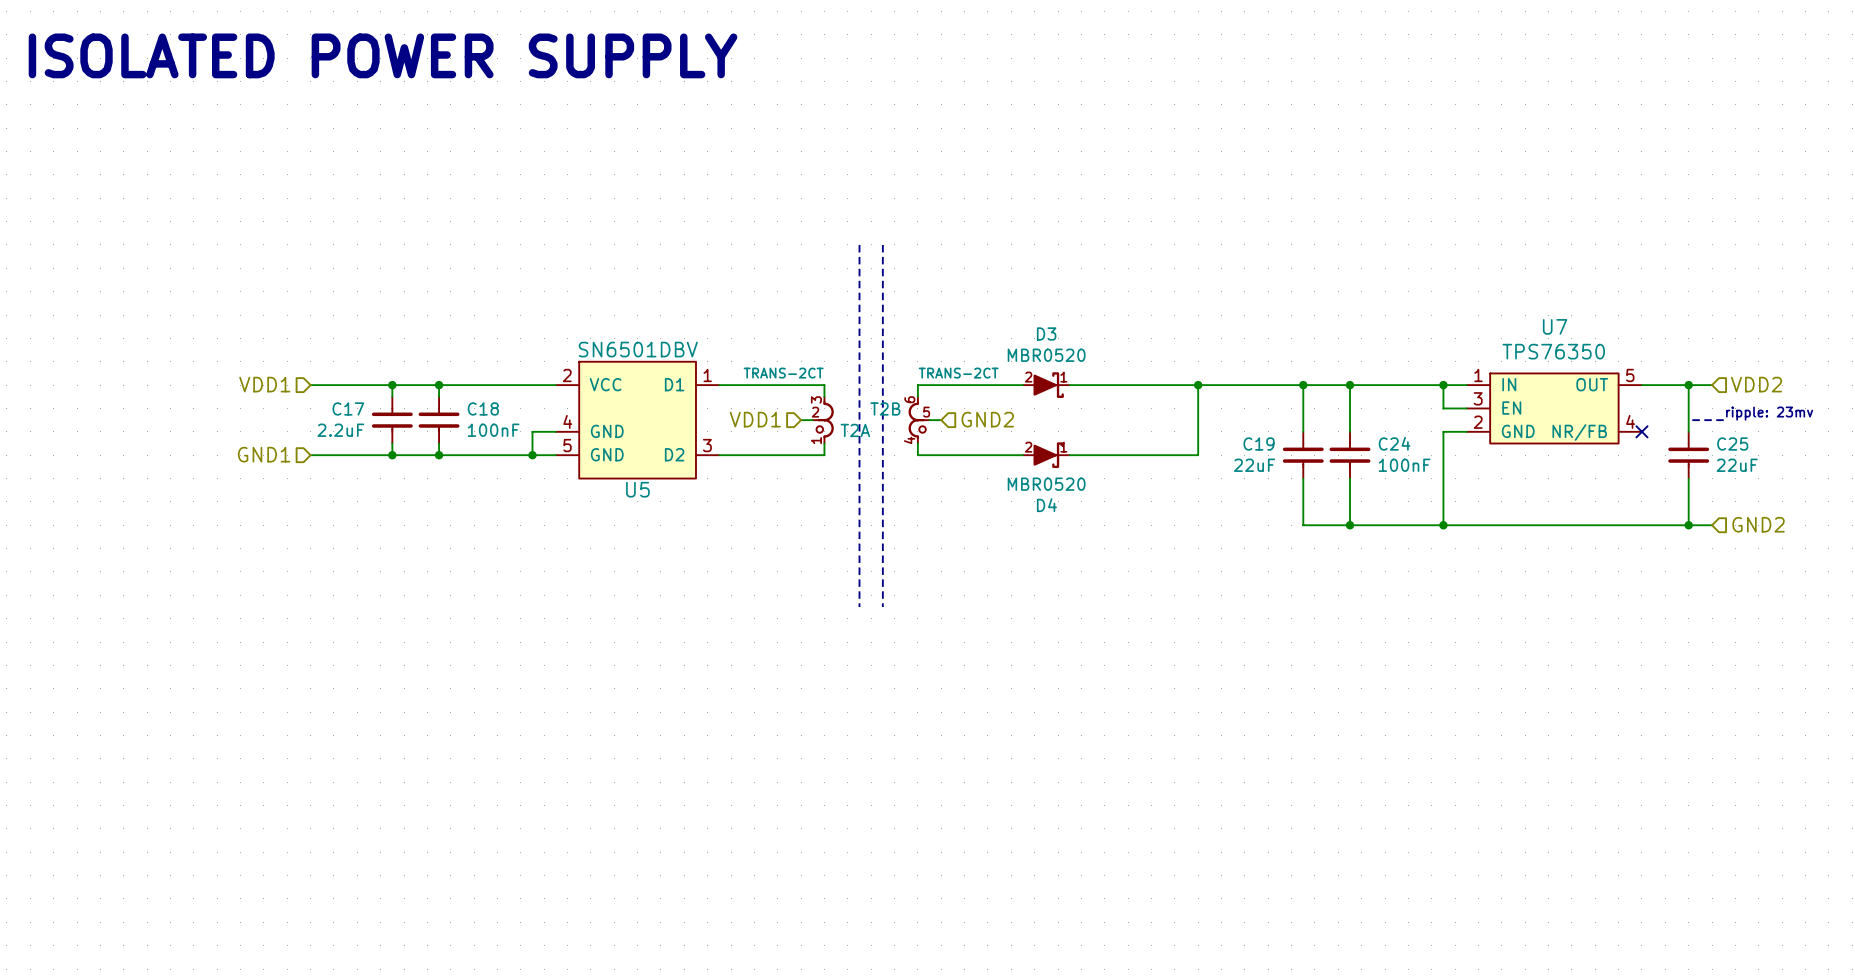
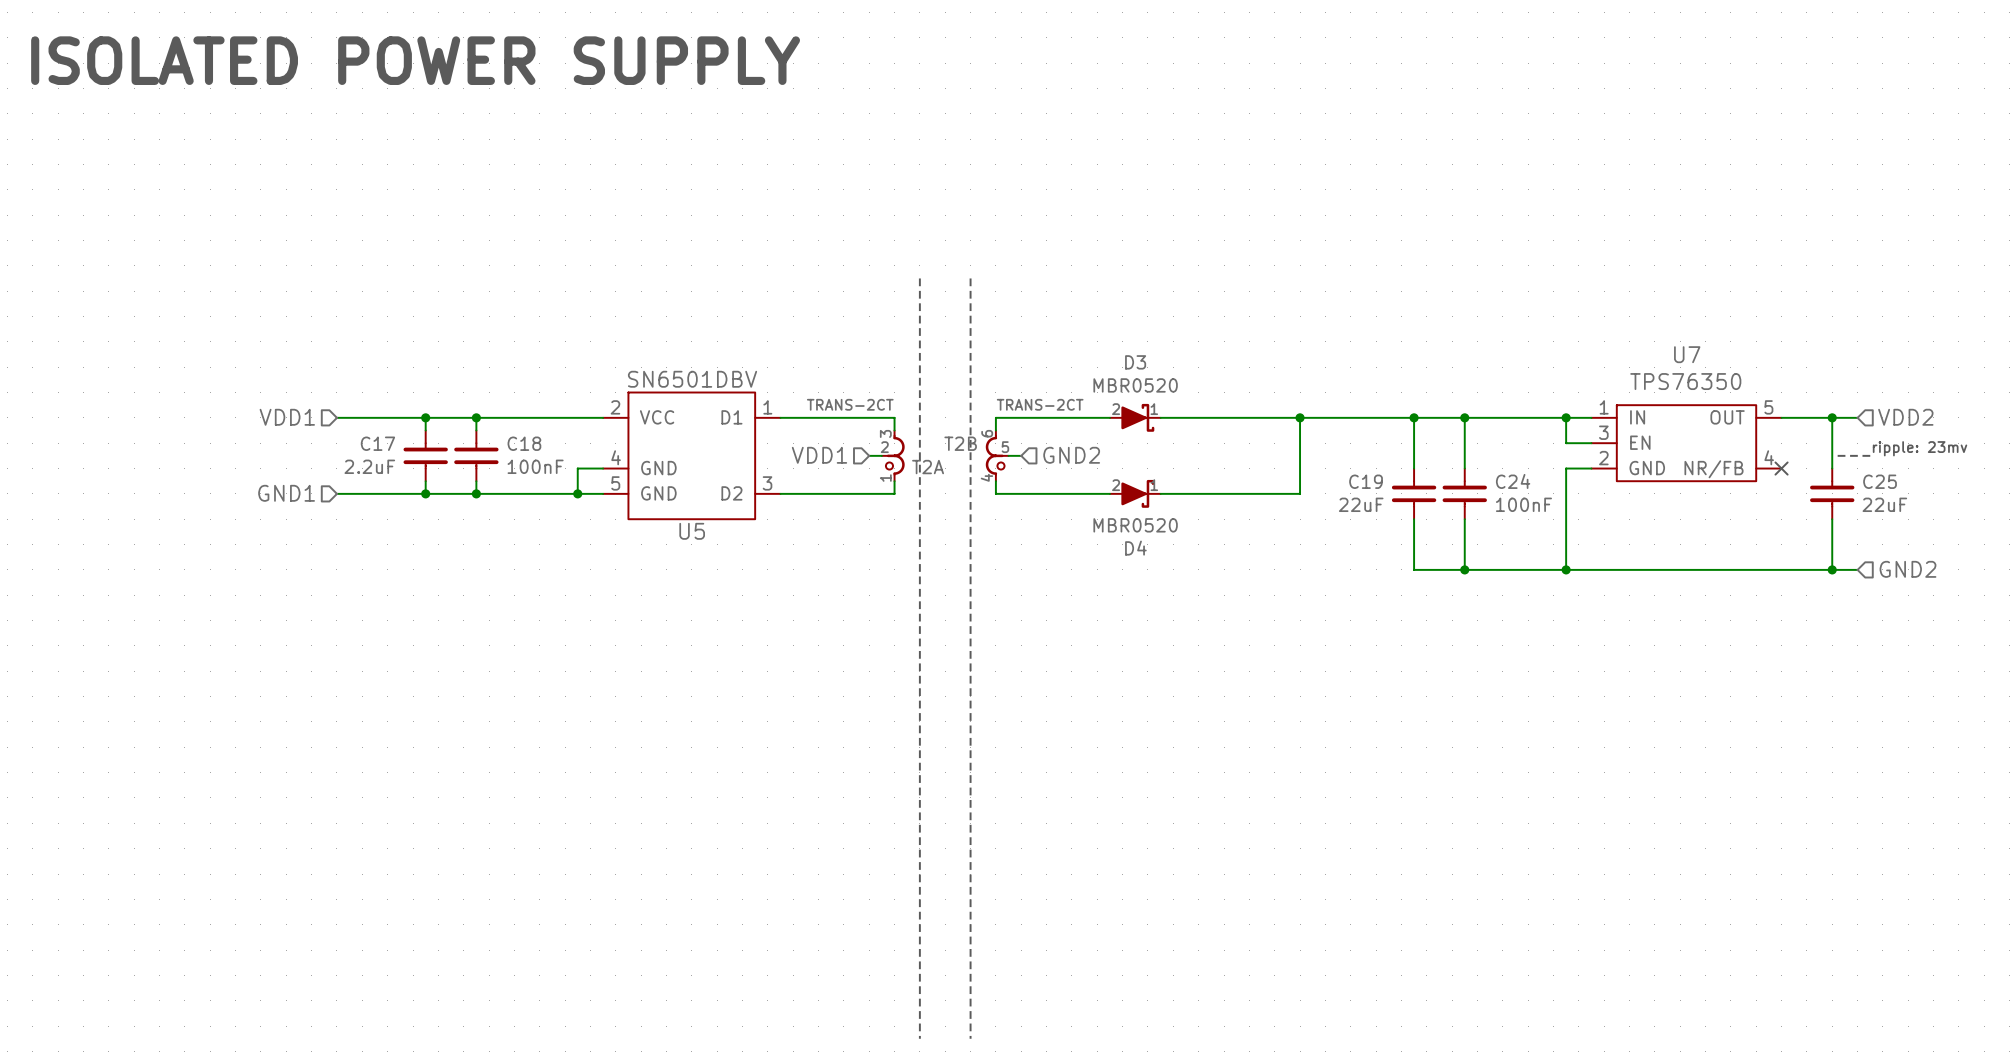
line: (859, 244) (859, 607) -> none
line: (882, 244) (882, 607) -> none
line: none -> (919, 278) (919, 1038)
line: none -> (970, 278) (970, 1038)

